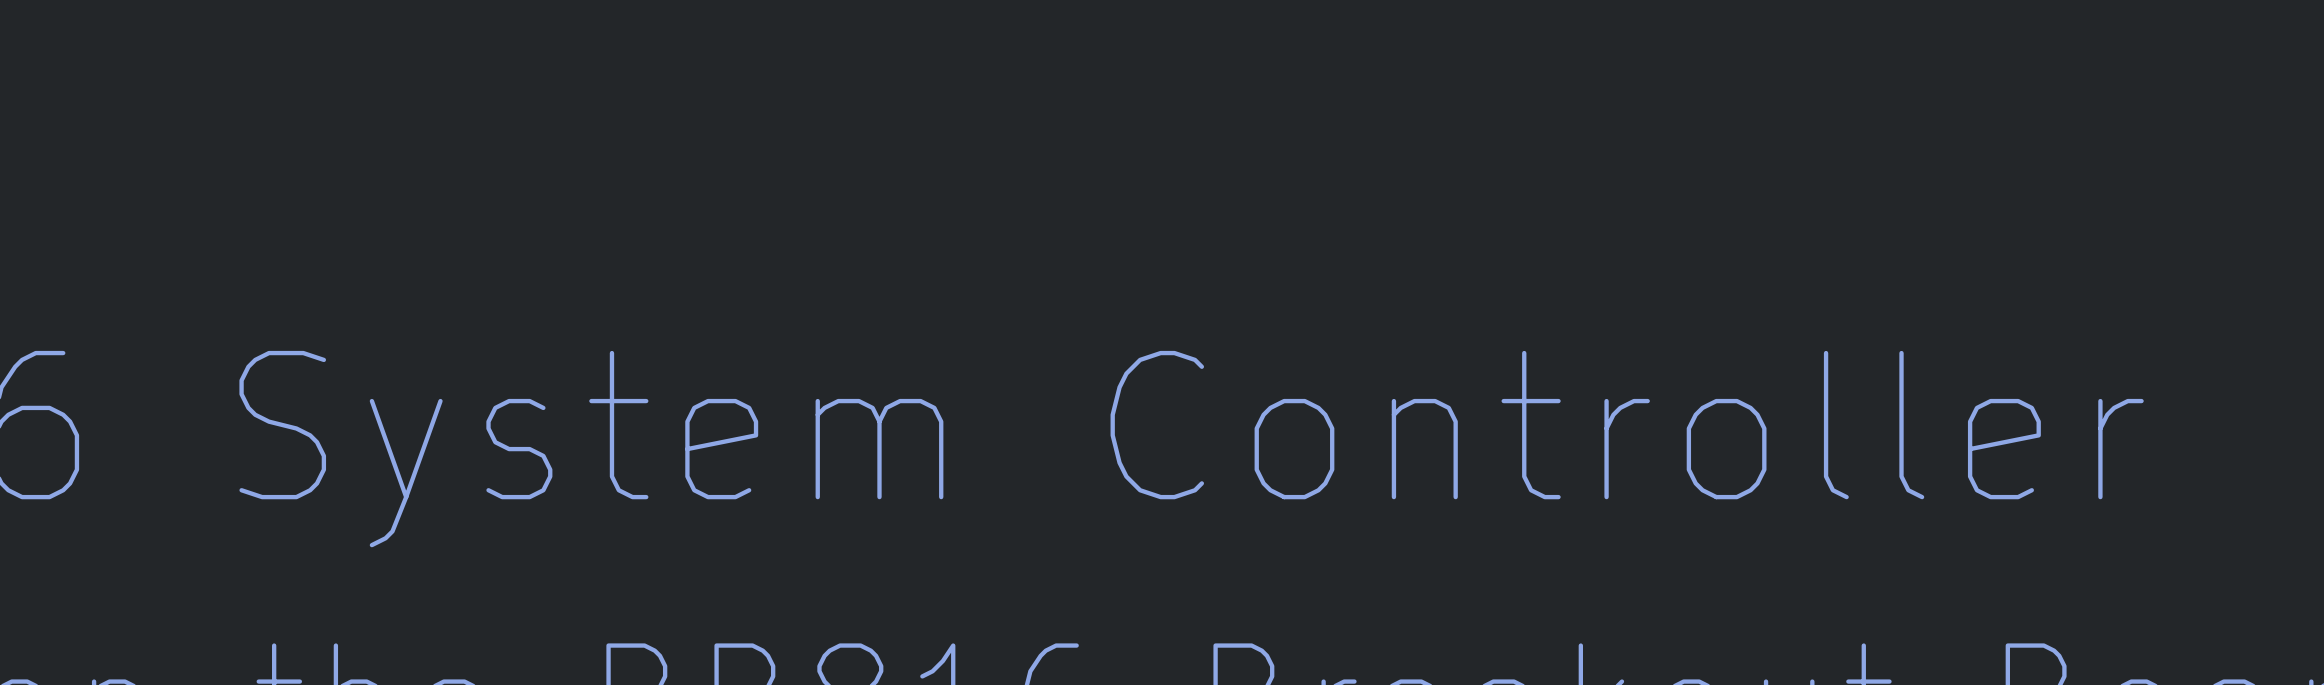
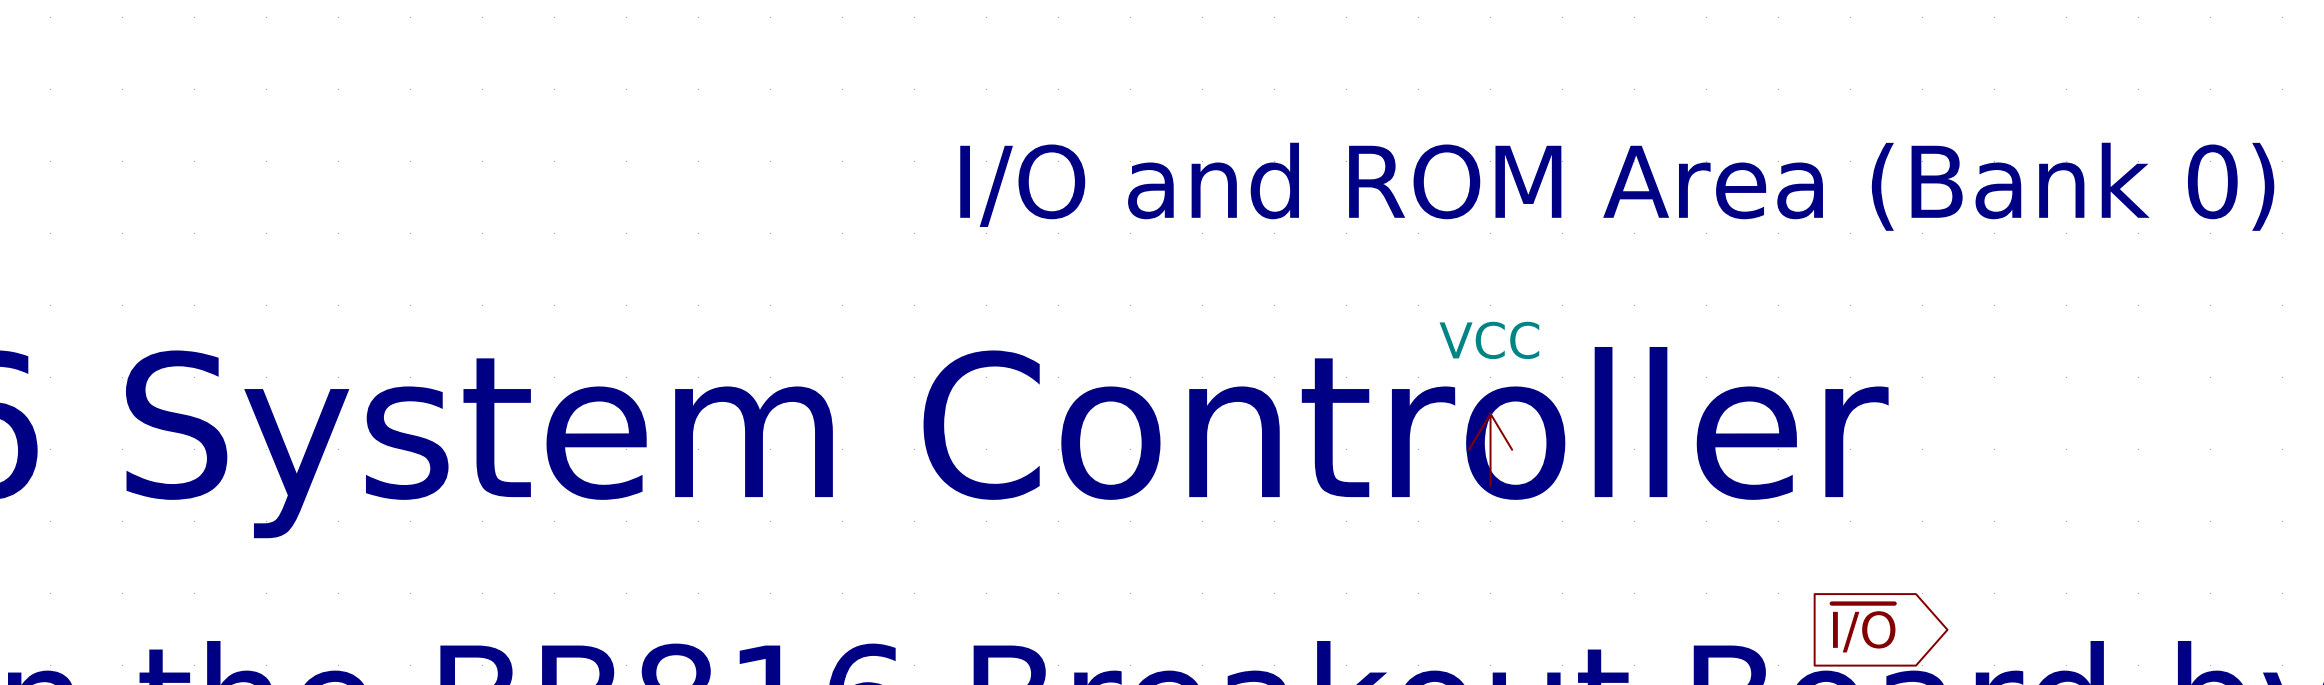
text: none -> I/O and ROM Area (Bank 0) (1617, 186)
power symbol: none -> VCC (1490, 449)
global label: none -> ~{I/O} (1863, 628)

